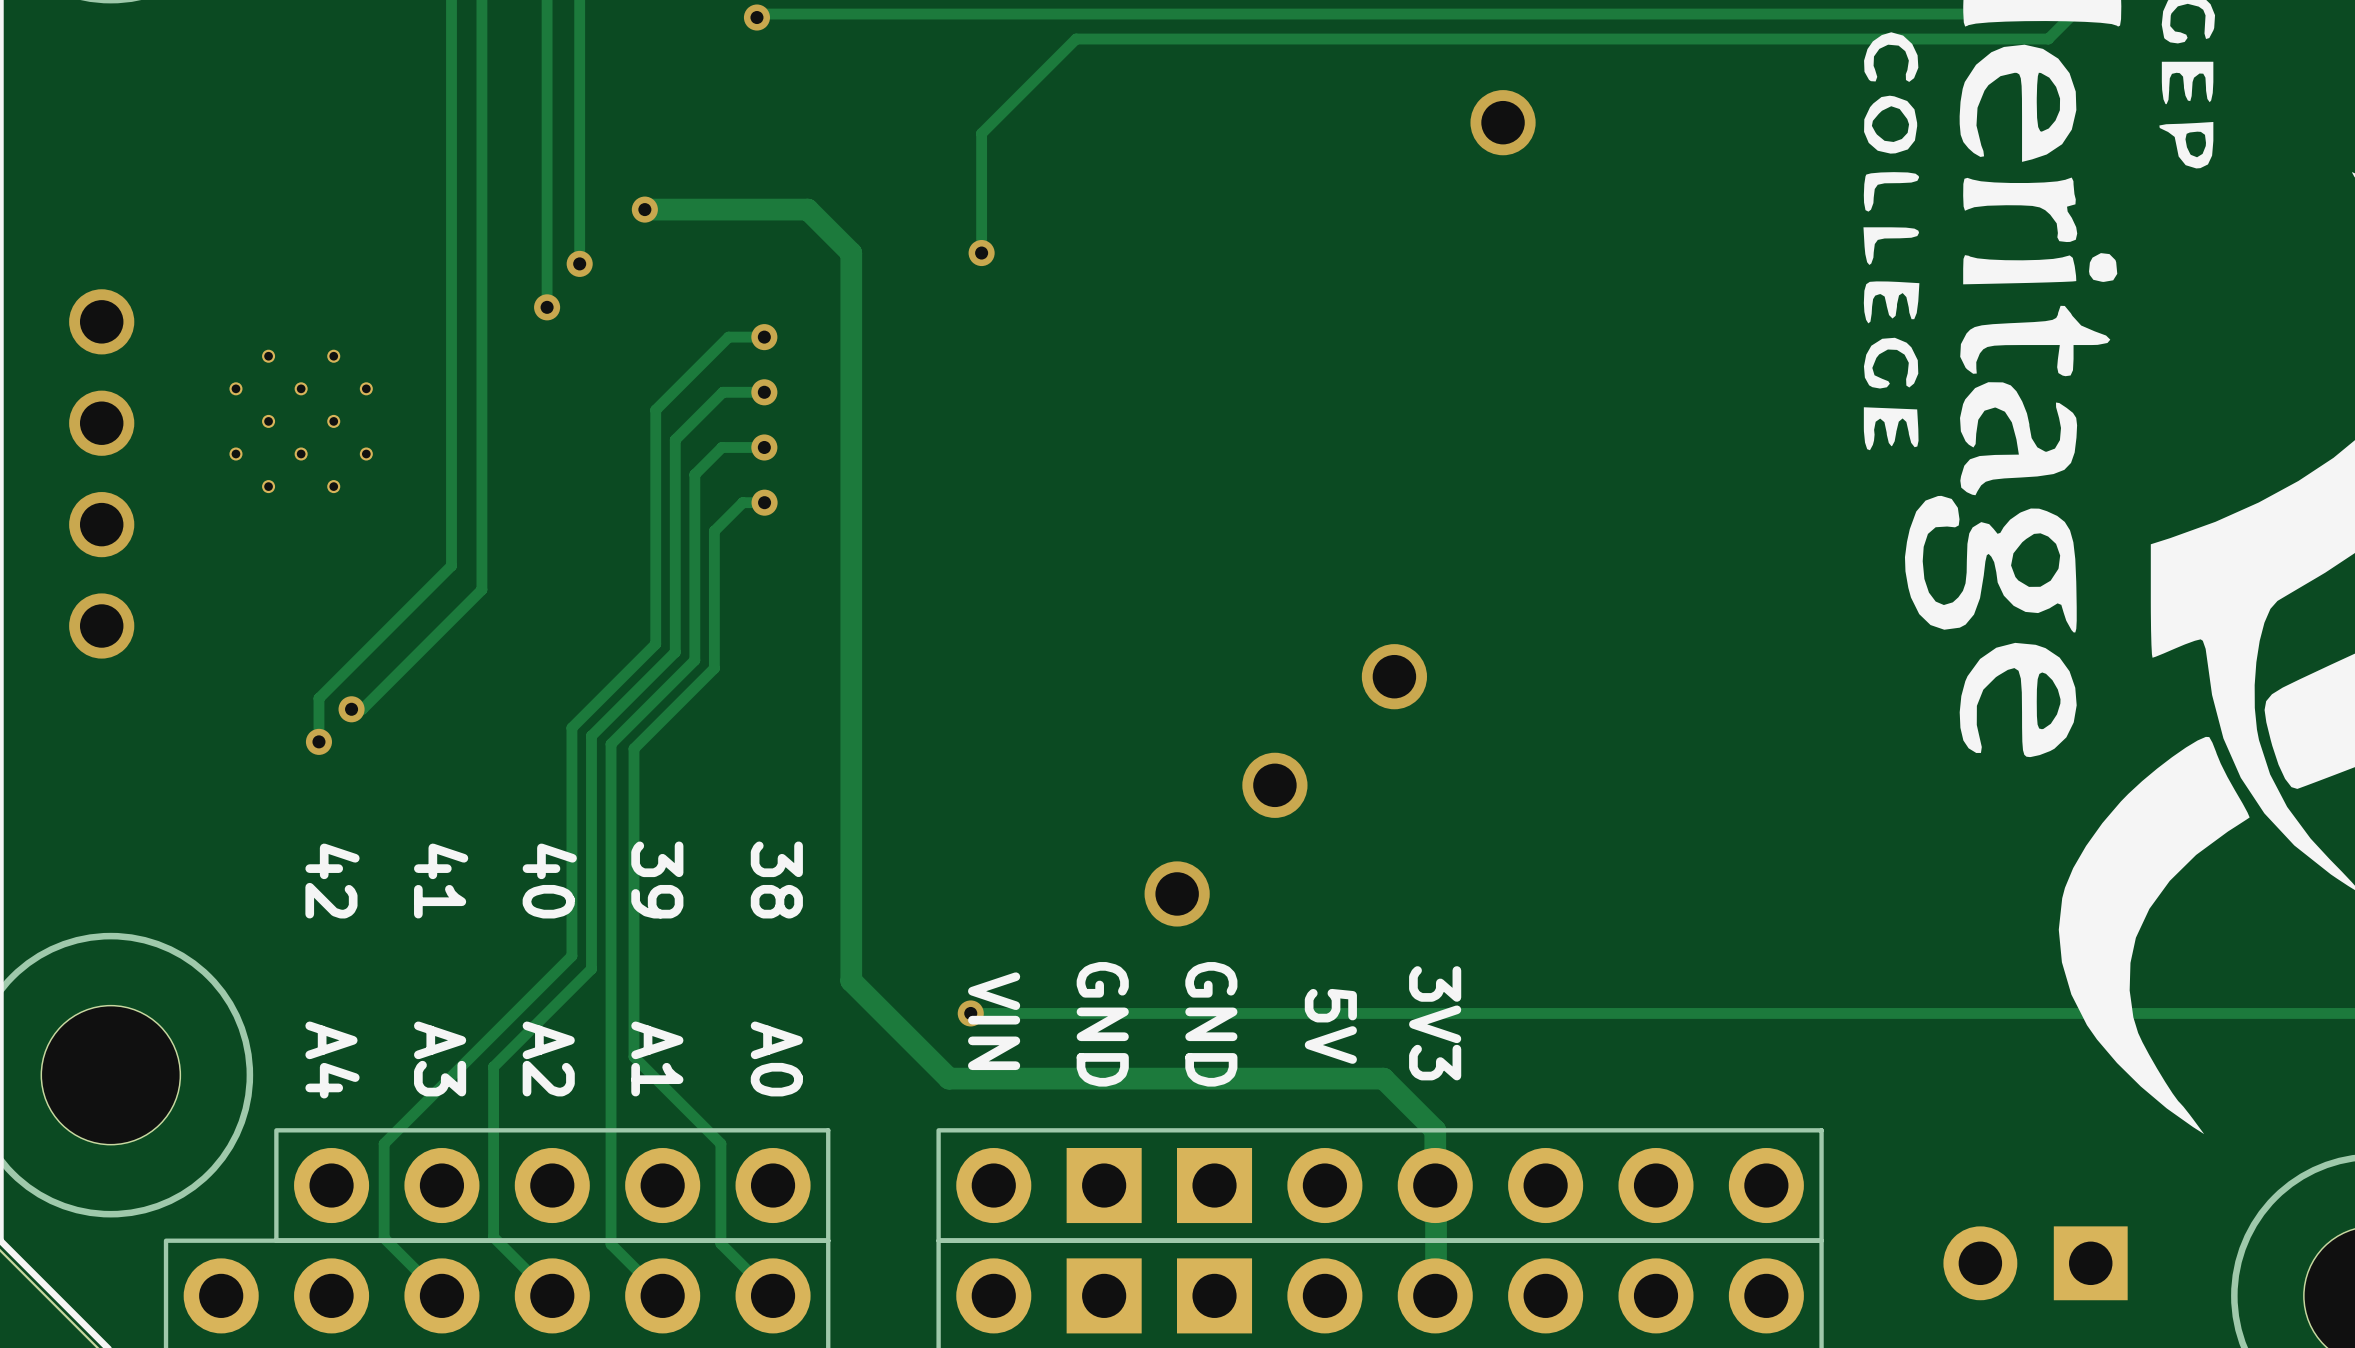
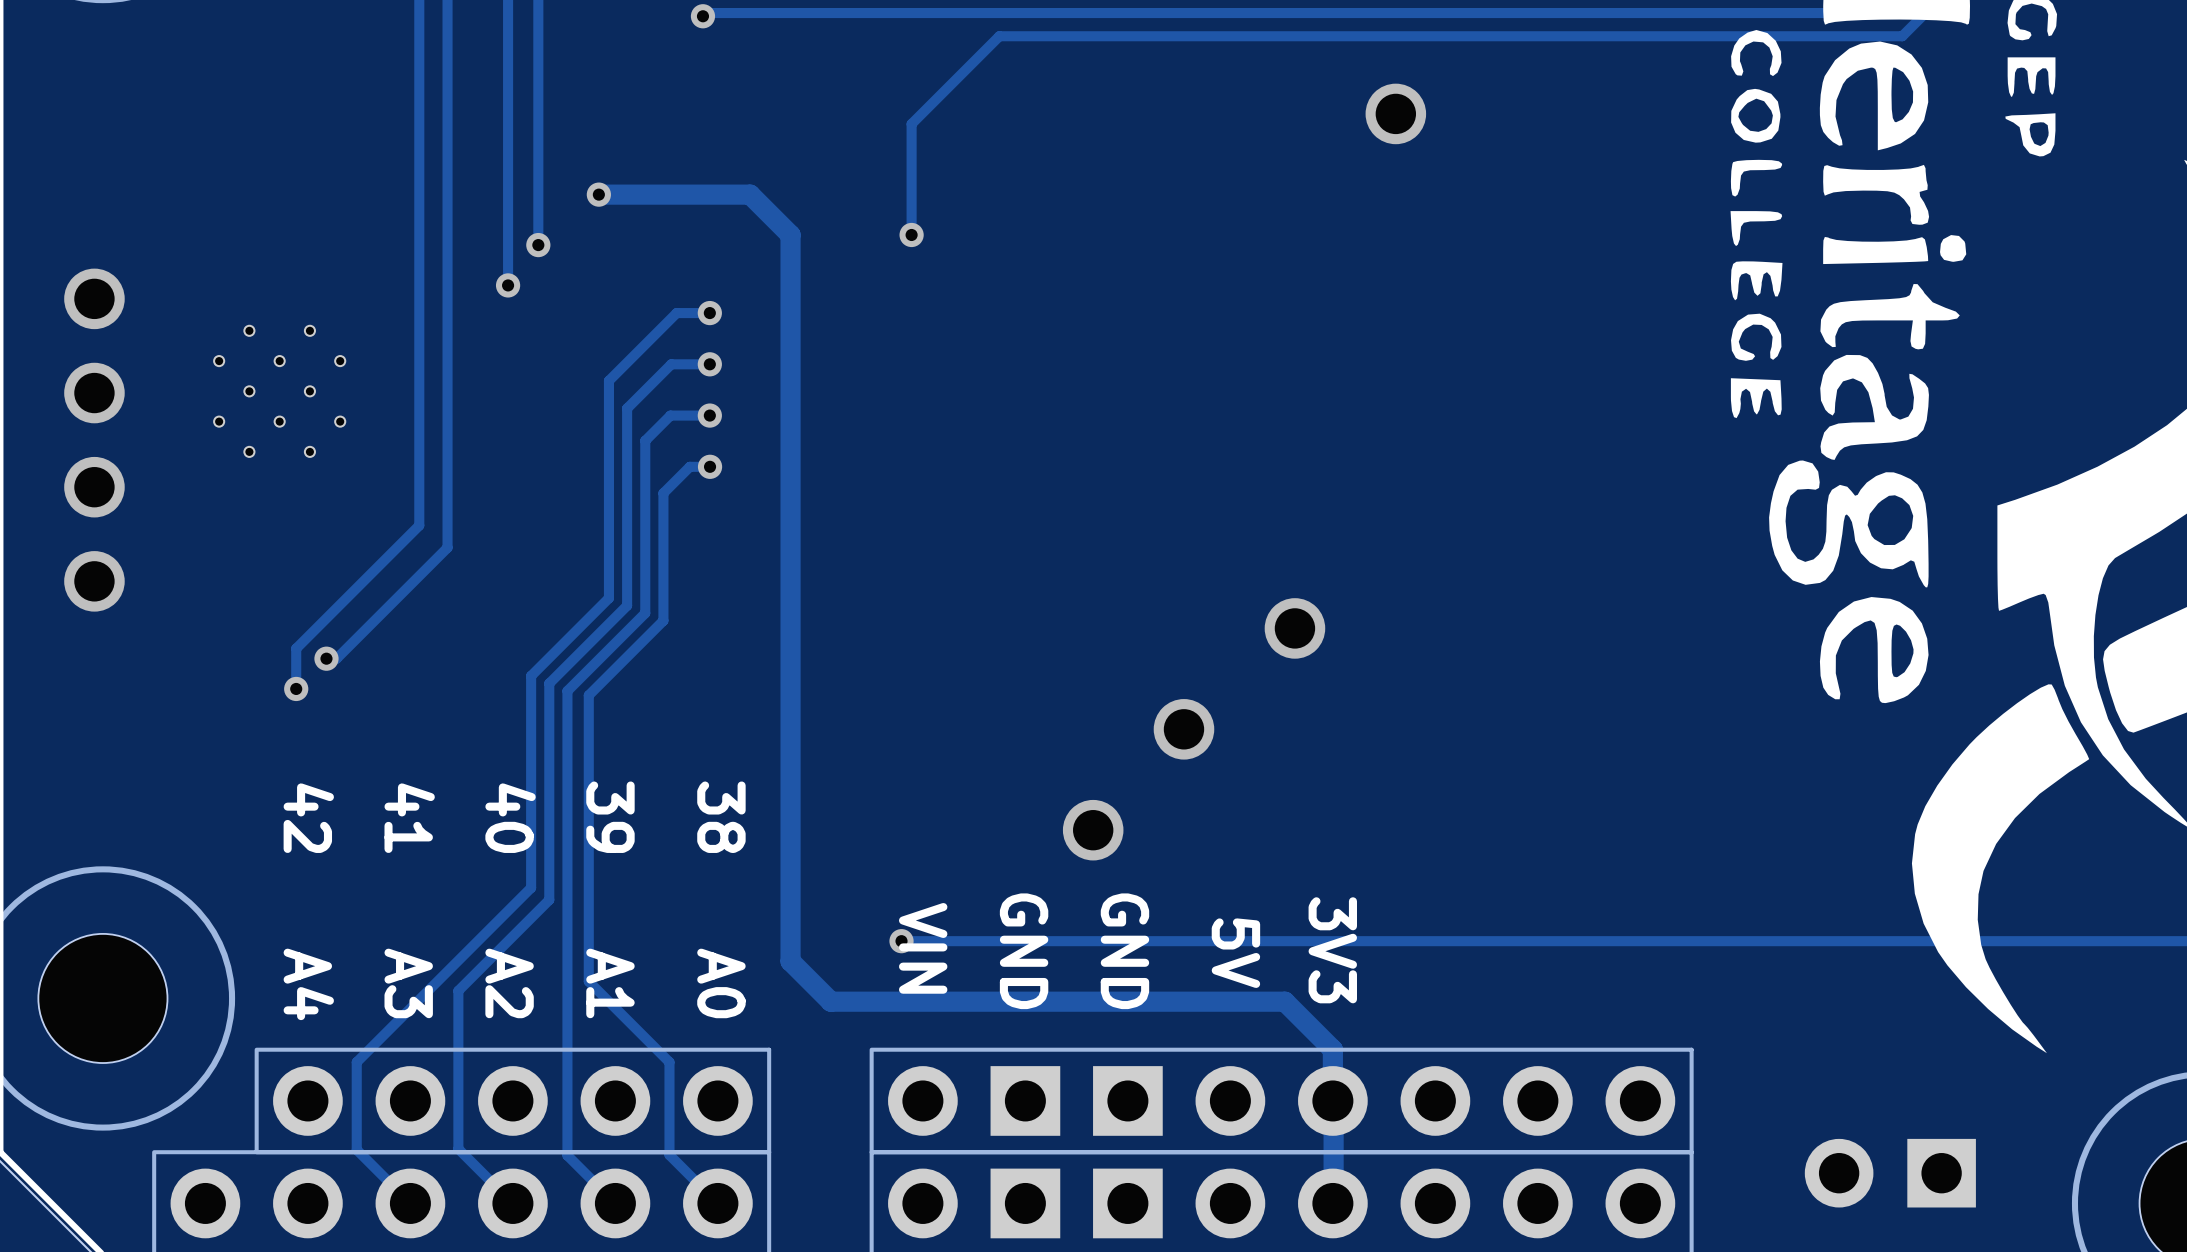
track: (851, 980) (949, 1078) -> (790, 910) (790, 961) (830, 1001) (881, 1001)

